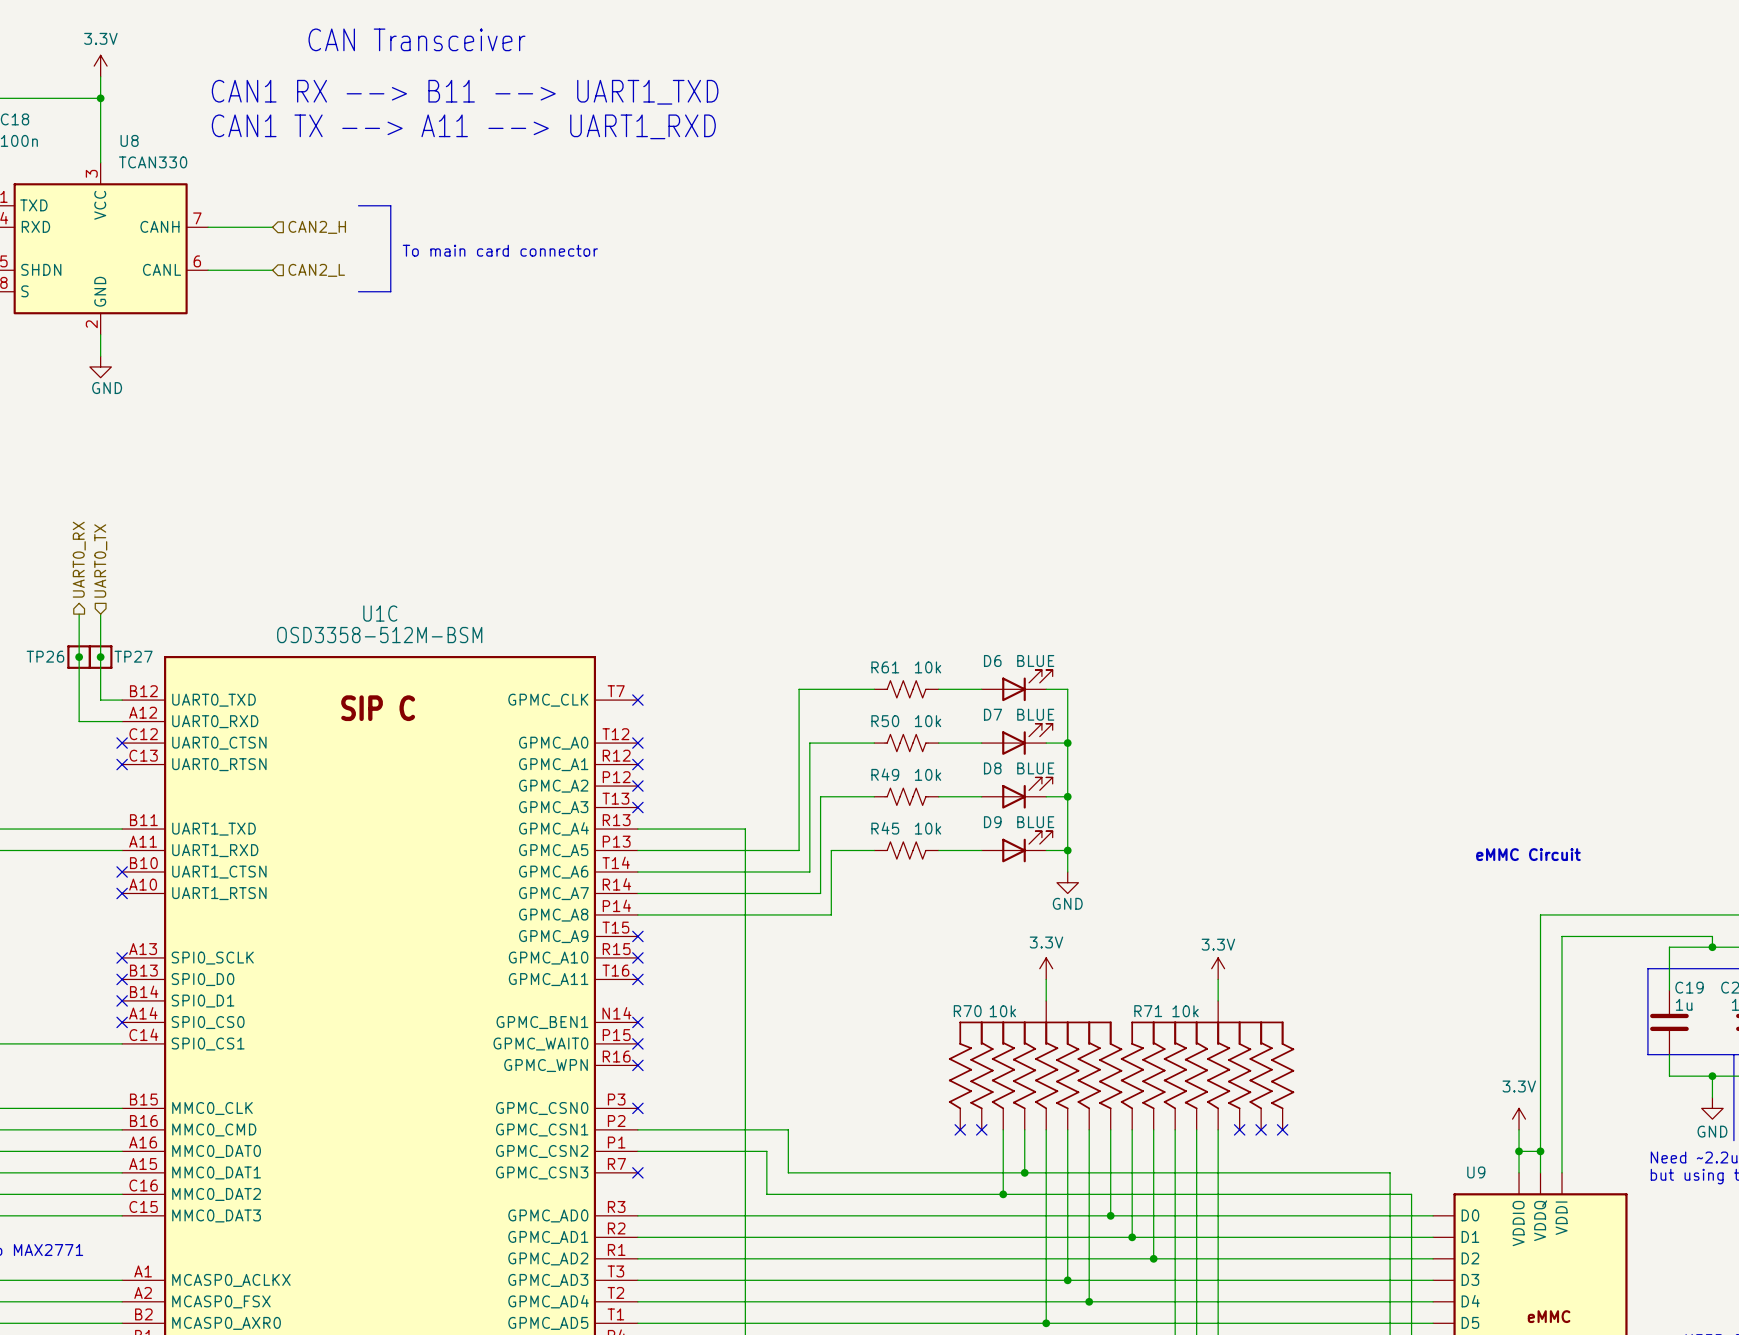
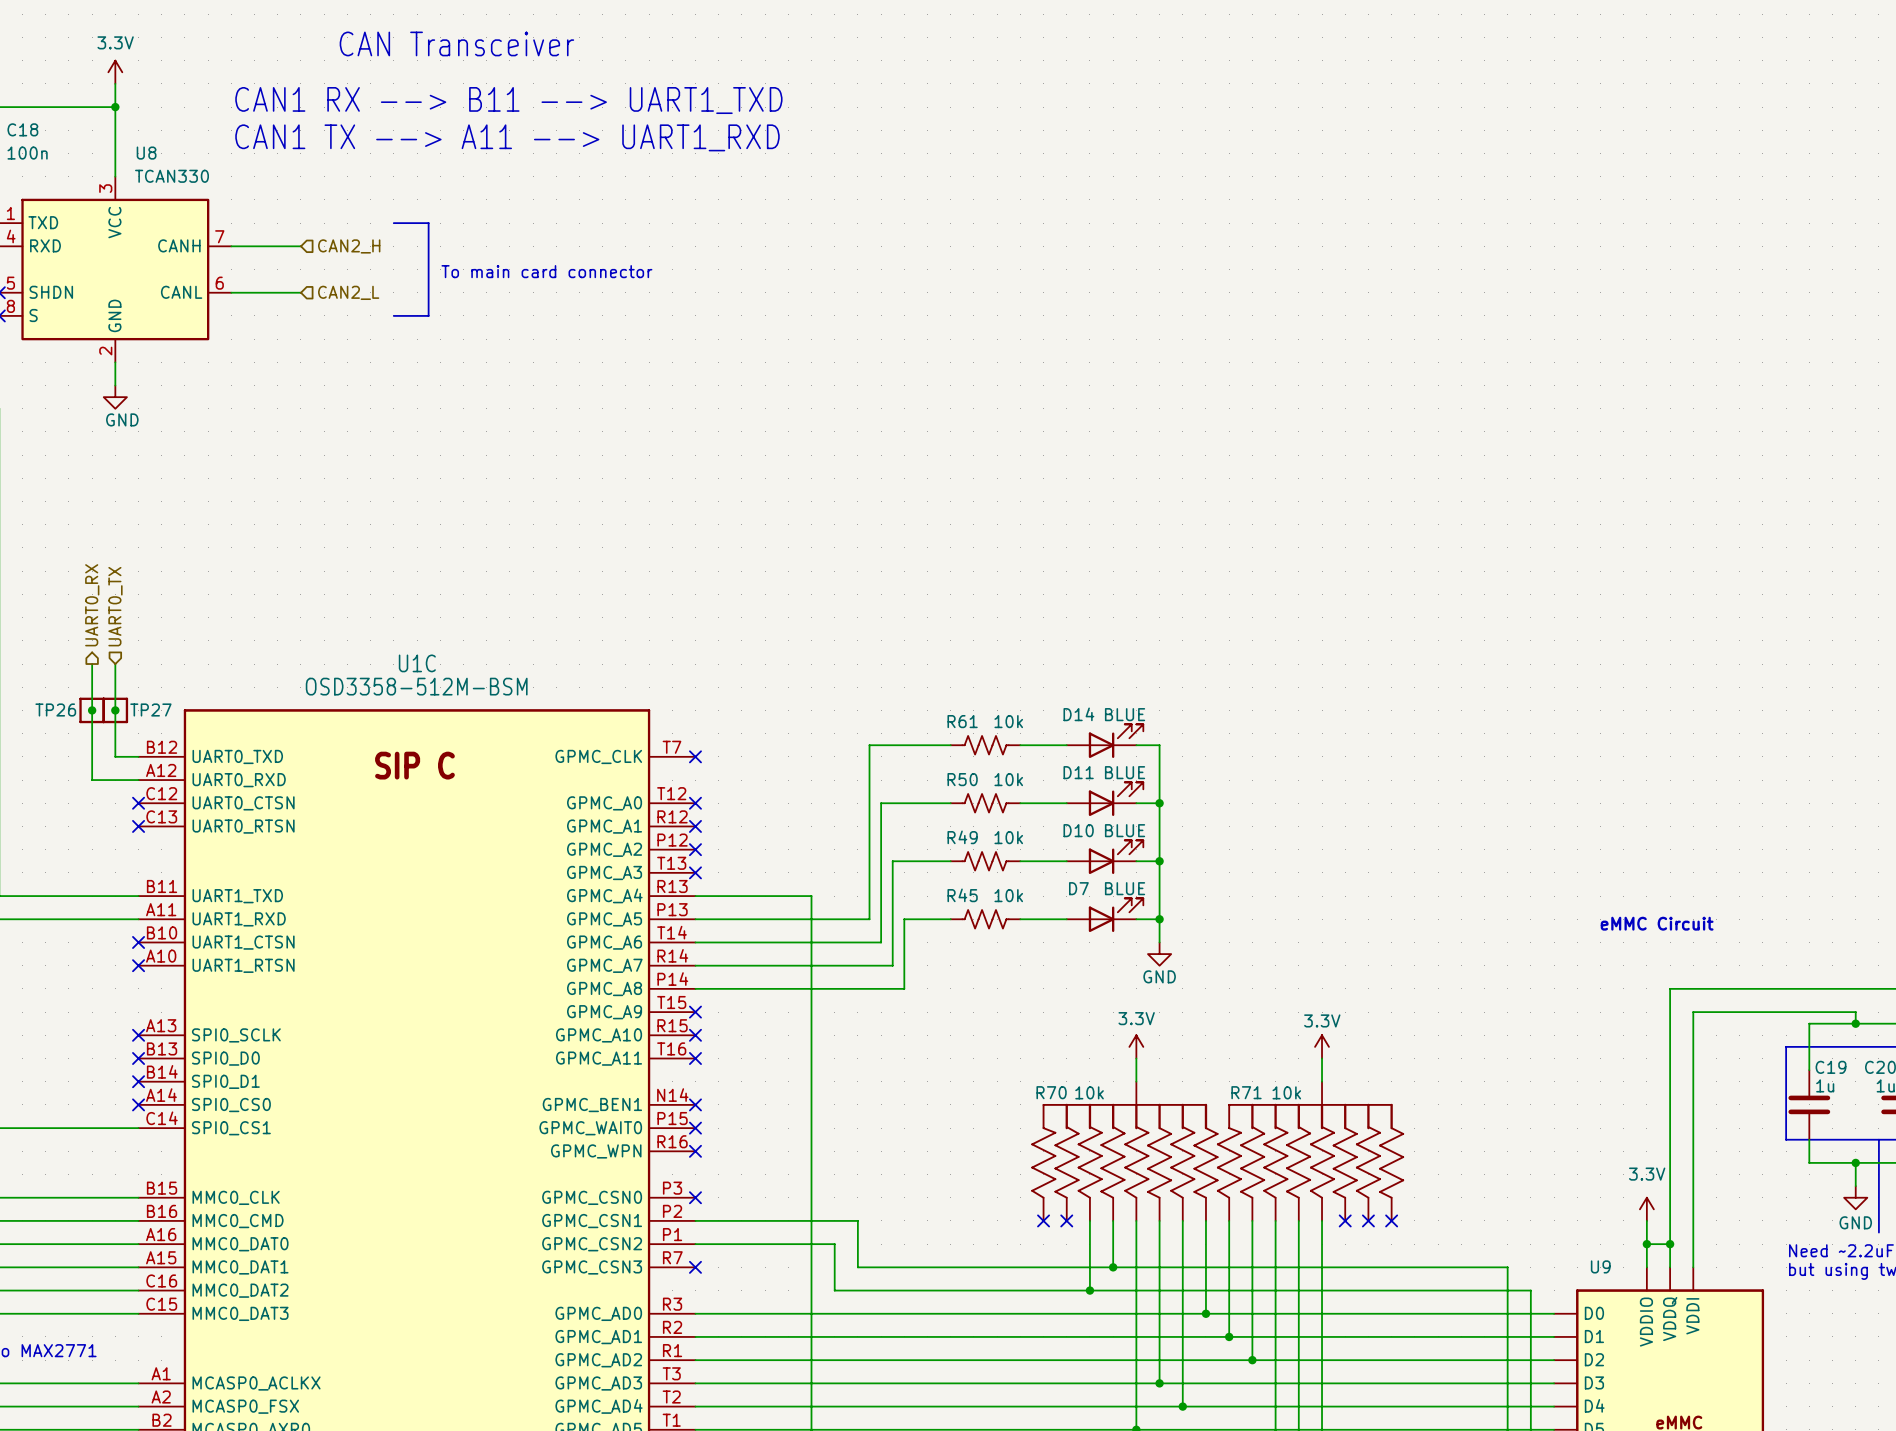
D6 name: D6 (992, 660) -> D14 (1078, 714)
D7 name: D7 (993, 714) -> D11 (1078, 772)
D8 name: D8 (992, 768) -> D10 (1078, 830)
D9 name: D9 (992, 822) -> D7 (1078, 888)

